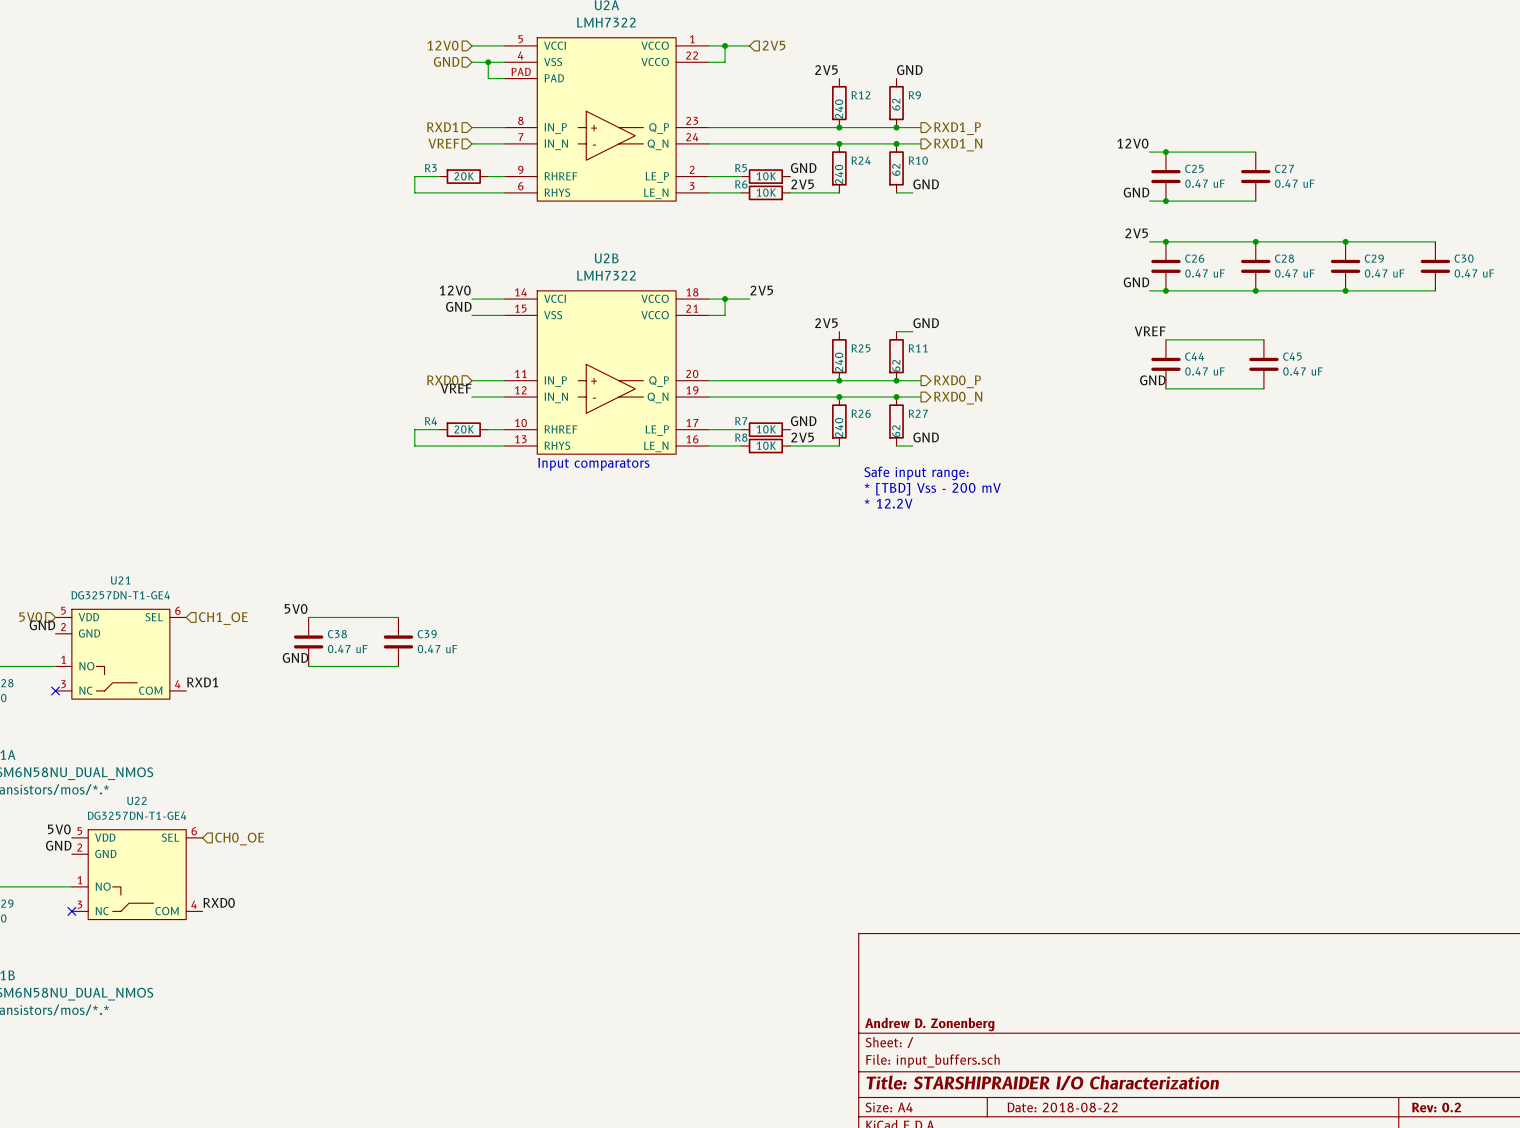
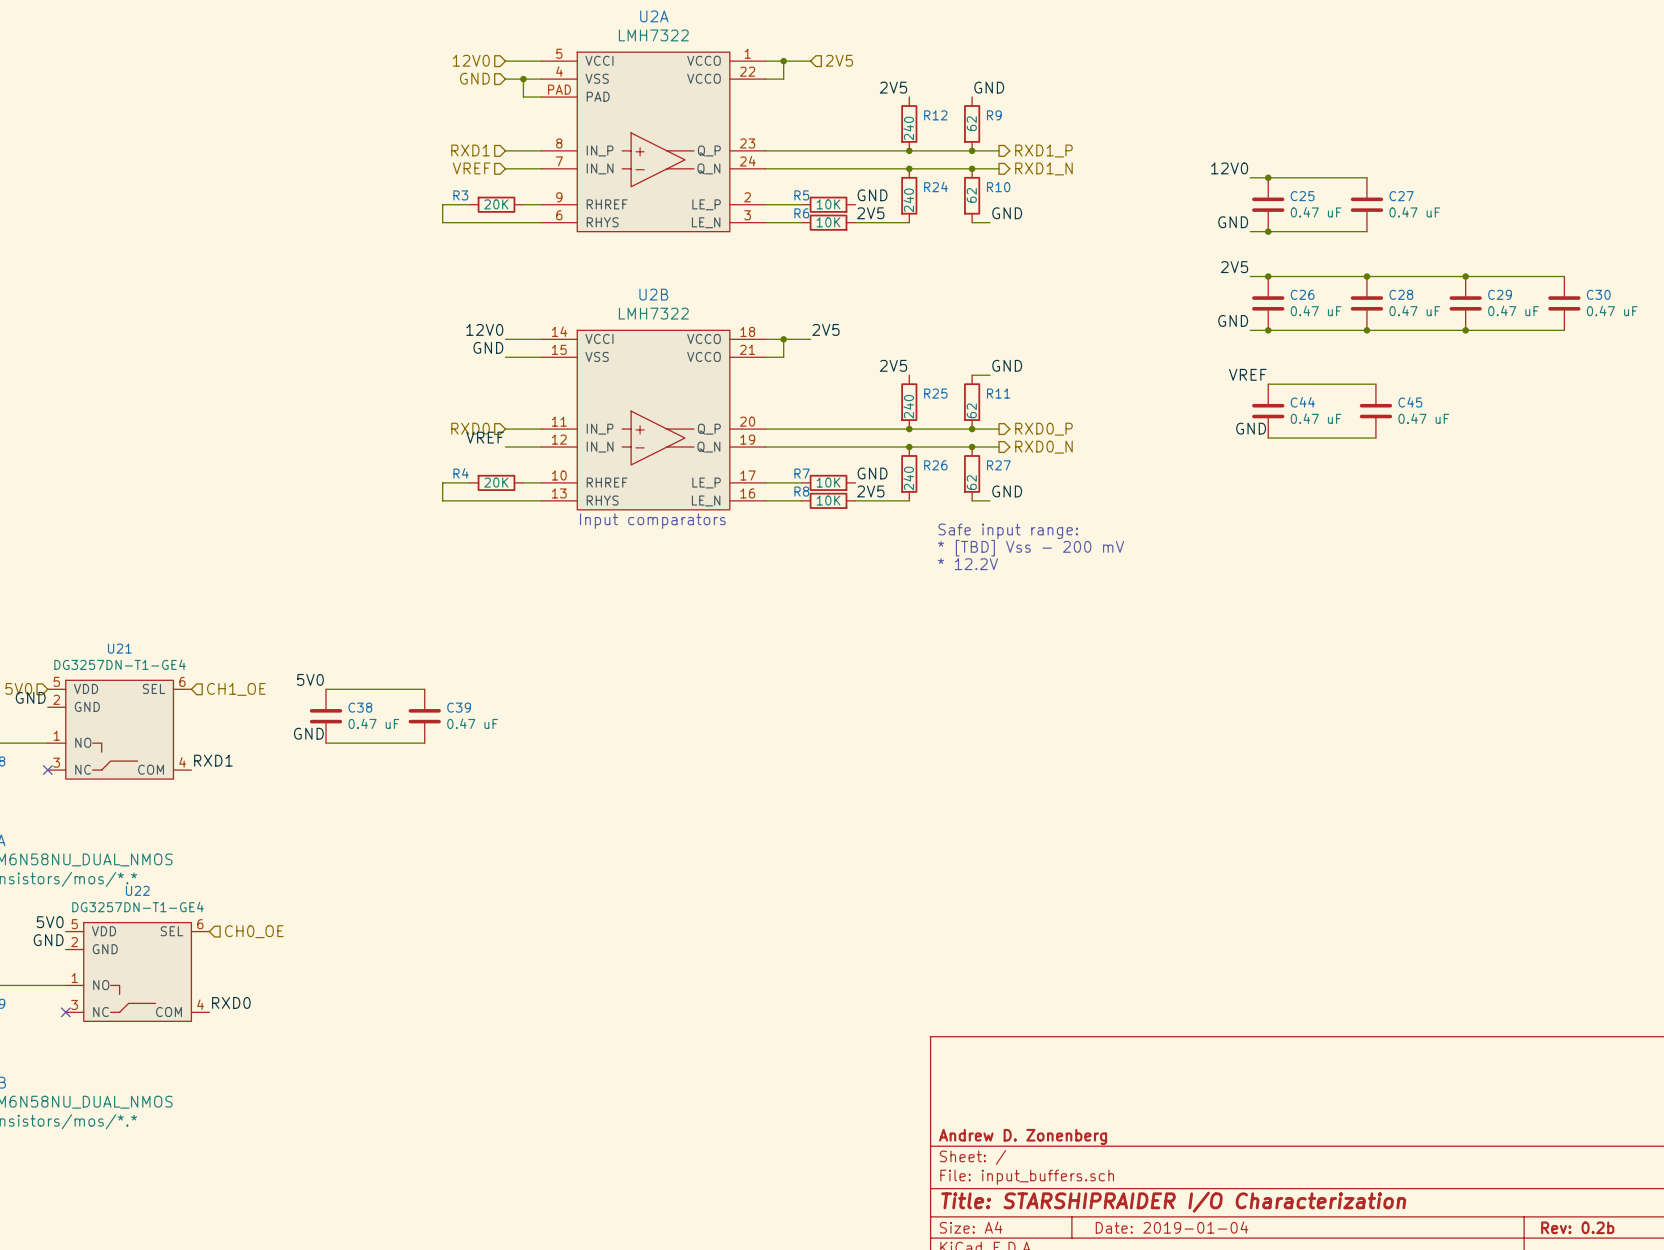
title block: Date: 2018-08-22 (1062, 1107) -> Date: 2019-01-04 (1172, 1227)
title block: Rev: 0.2 (1436, 1107) -> Rev: 0.2b (1577, 1227)

